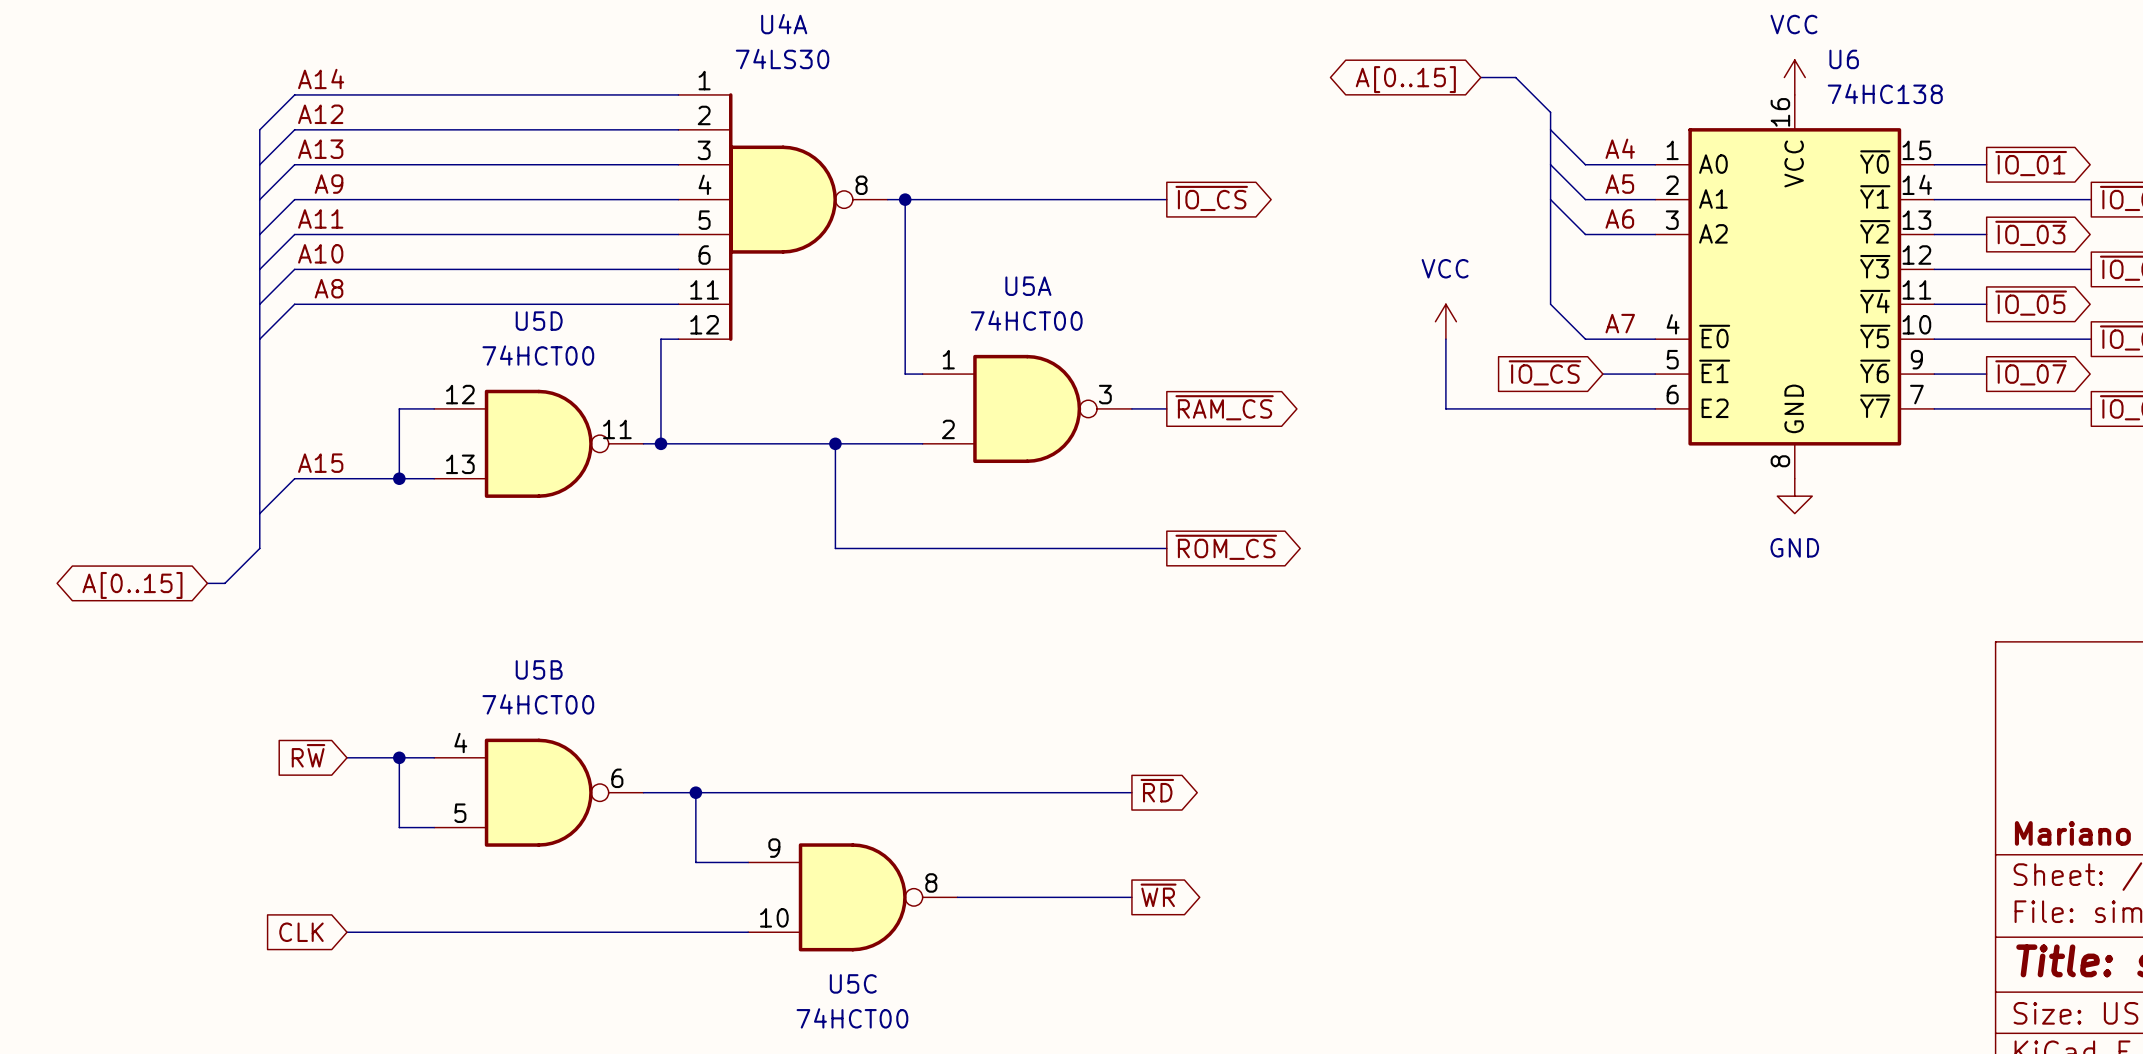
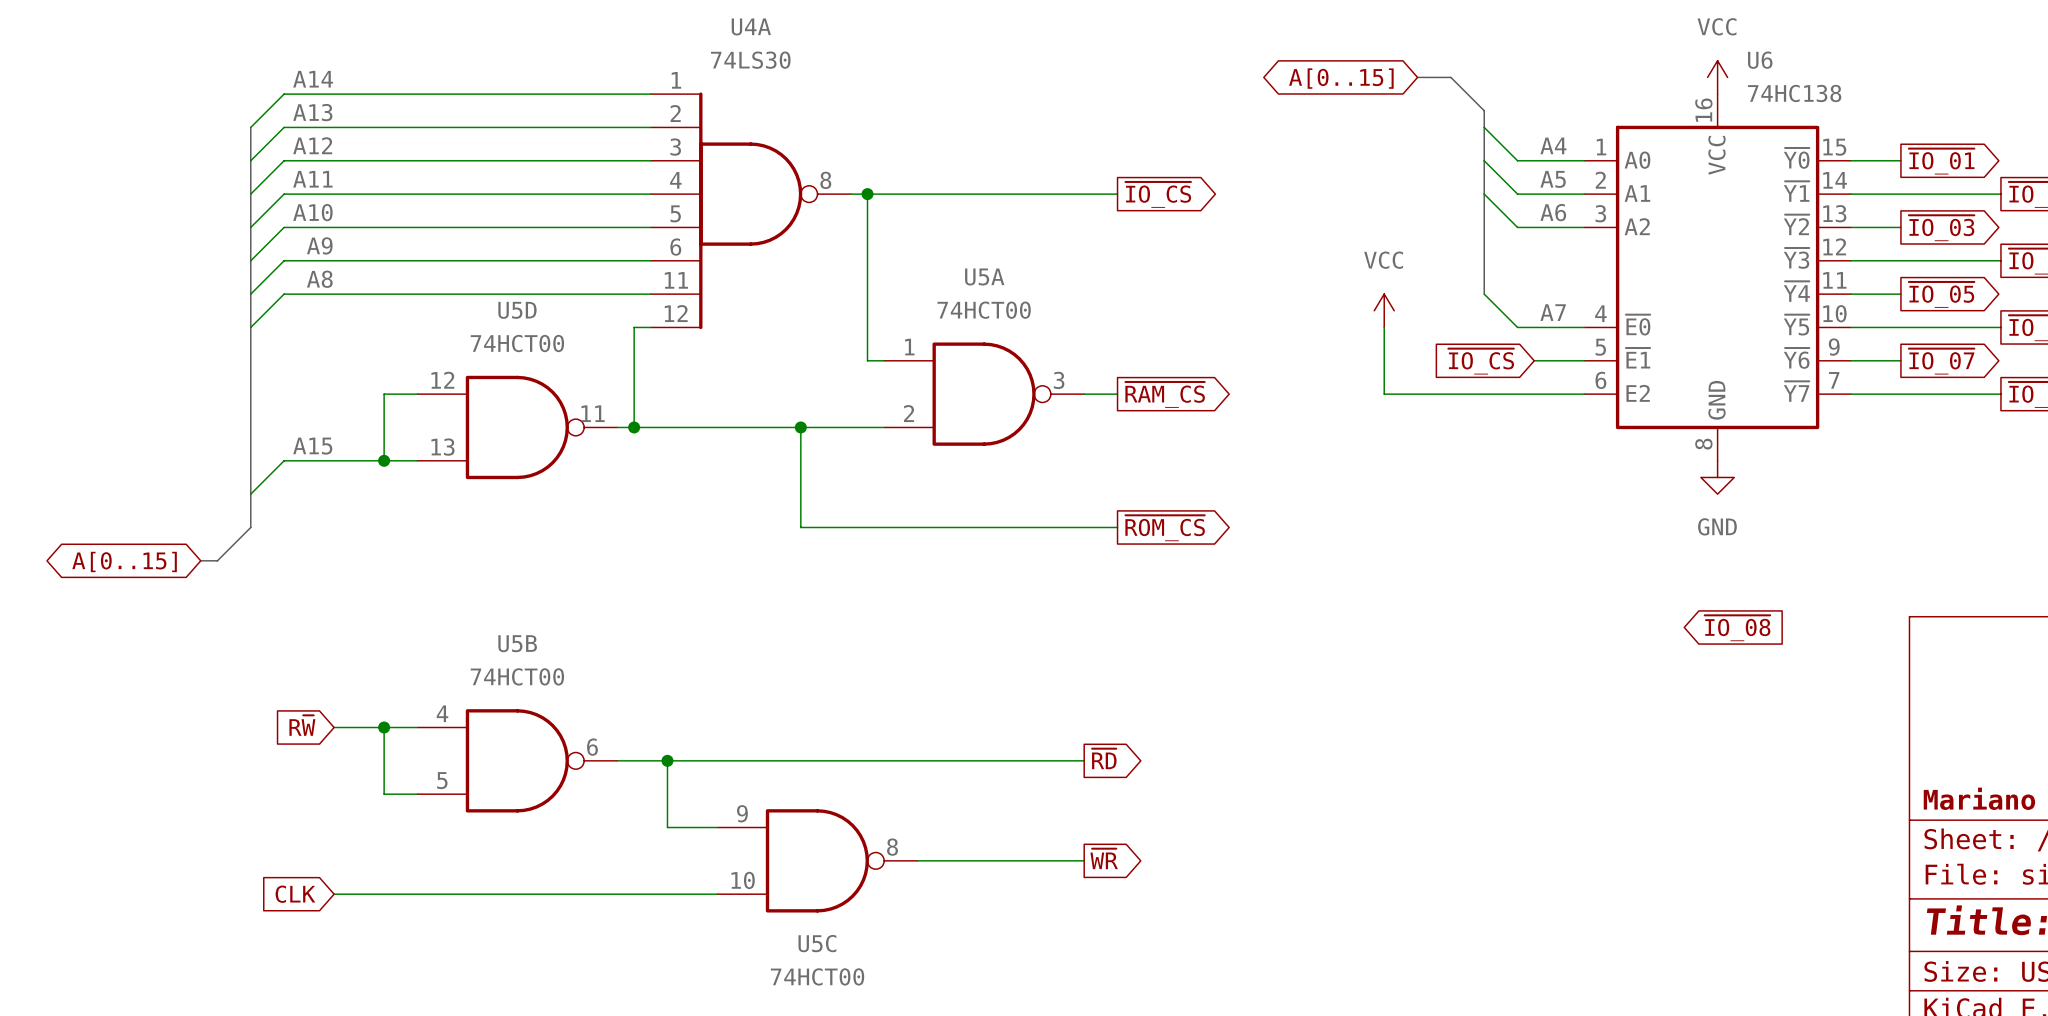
label: A12 (320, 114) -> A13 (312, 112)
label: A13 (320, 149) -> A12 (312, 145)
label: A9 (329, 184) -> A11 (312, 179)
label: A11 (320, 218) -> A10 (312, 212)
label: A10 (320, 253) -> A9 (319, 245)
global label: none -> ~{IO_08} (1737, 628)

